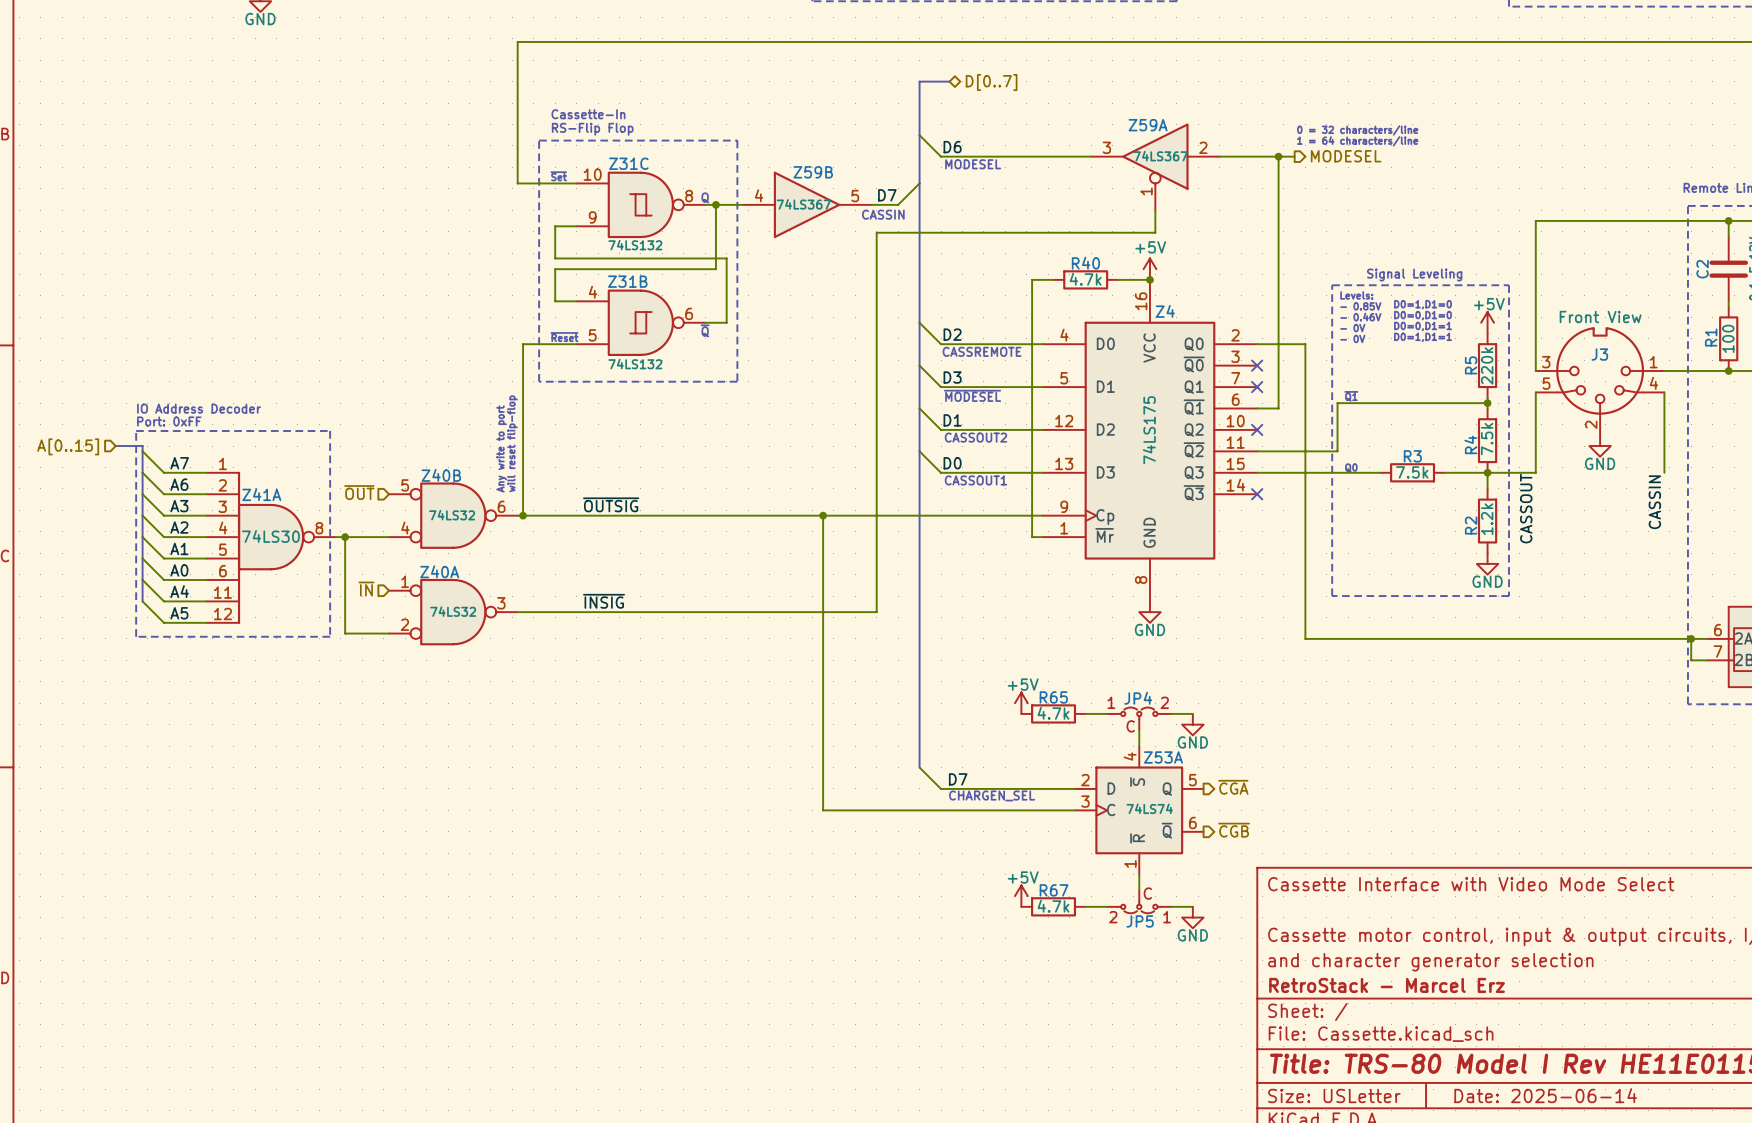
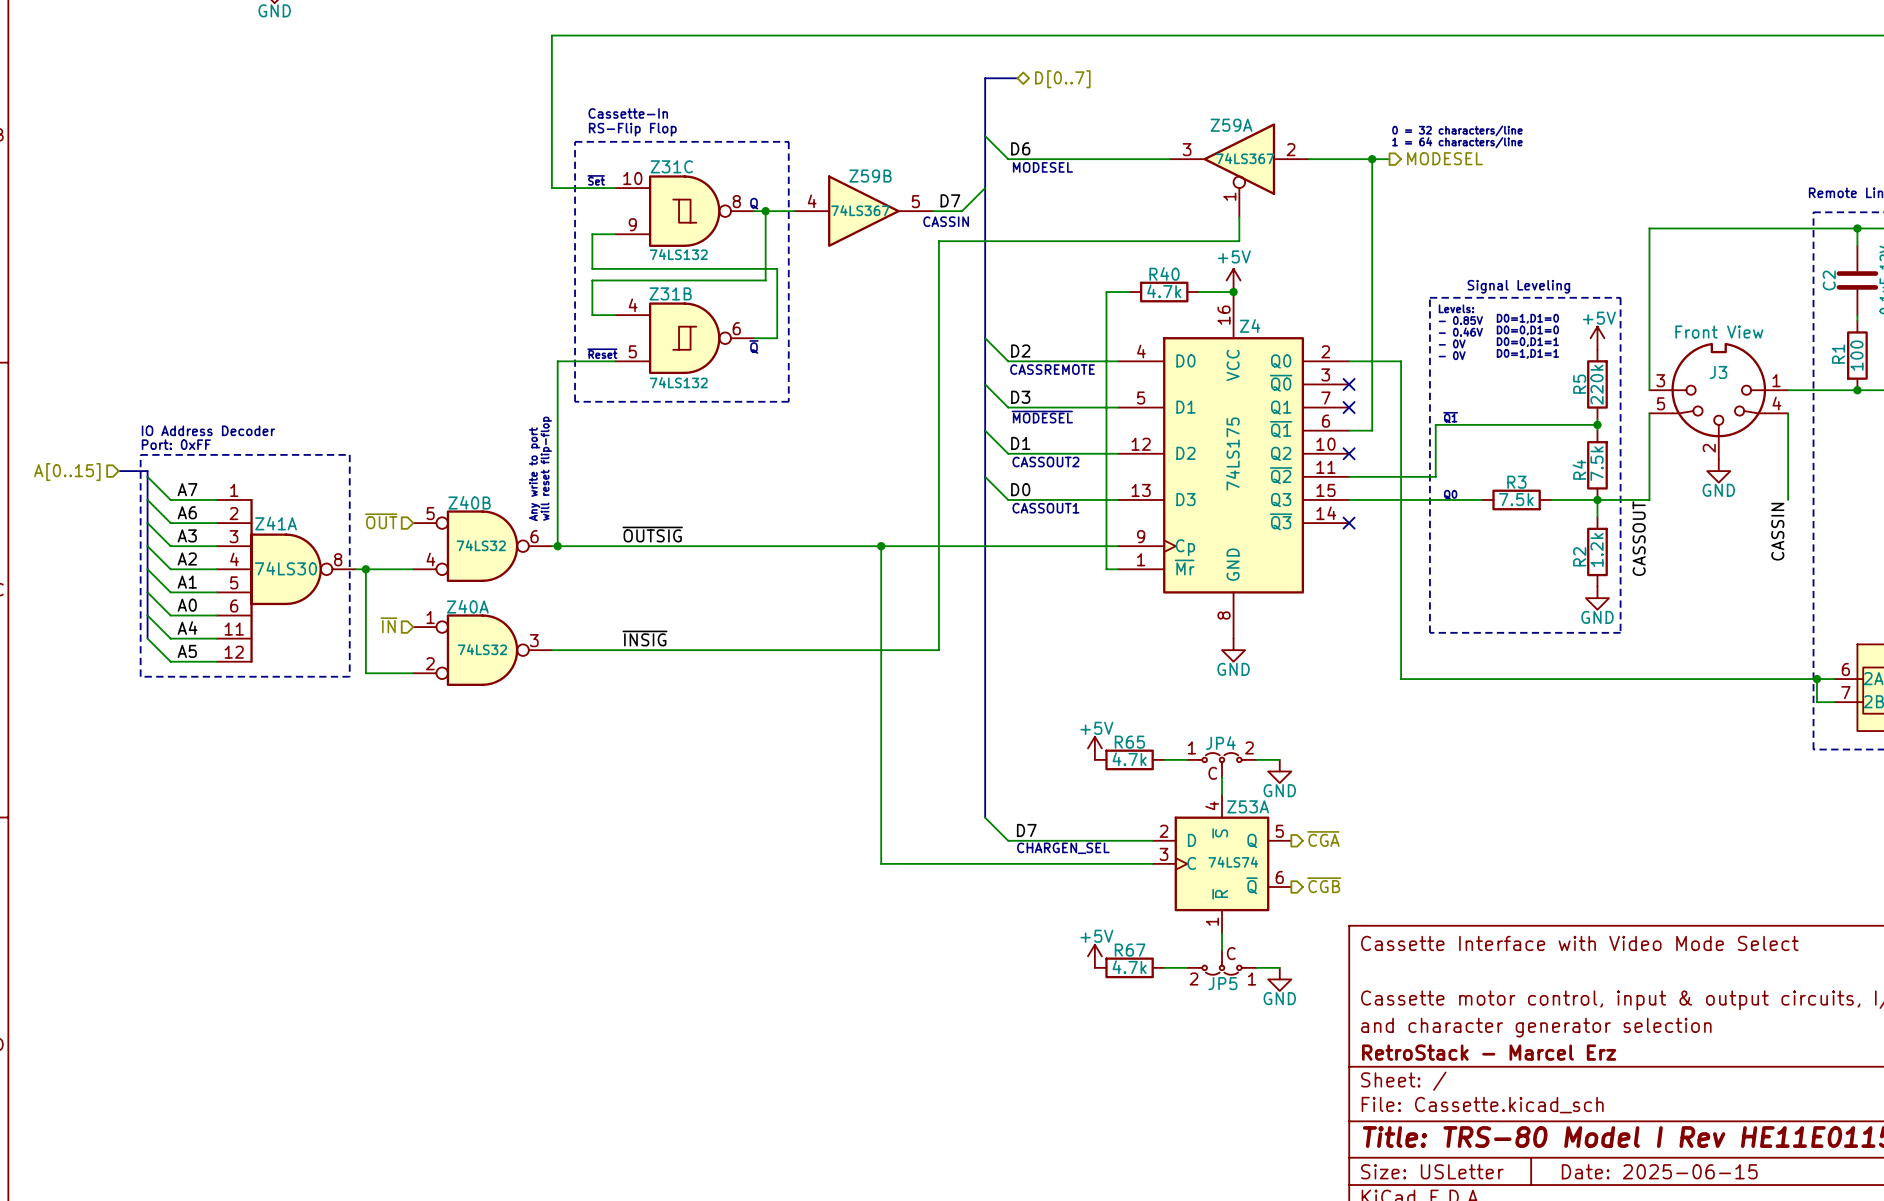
title block: Date: 2025-06-14 (1545, 1095) -> Date: 2025-06-15 (1659, 1171)

